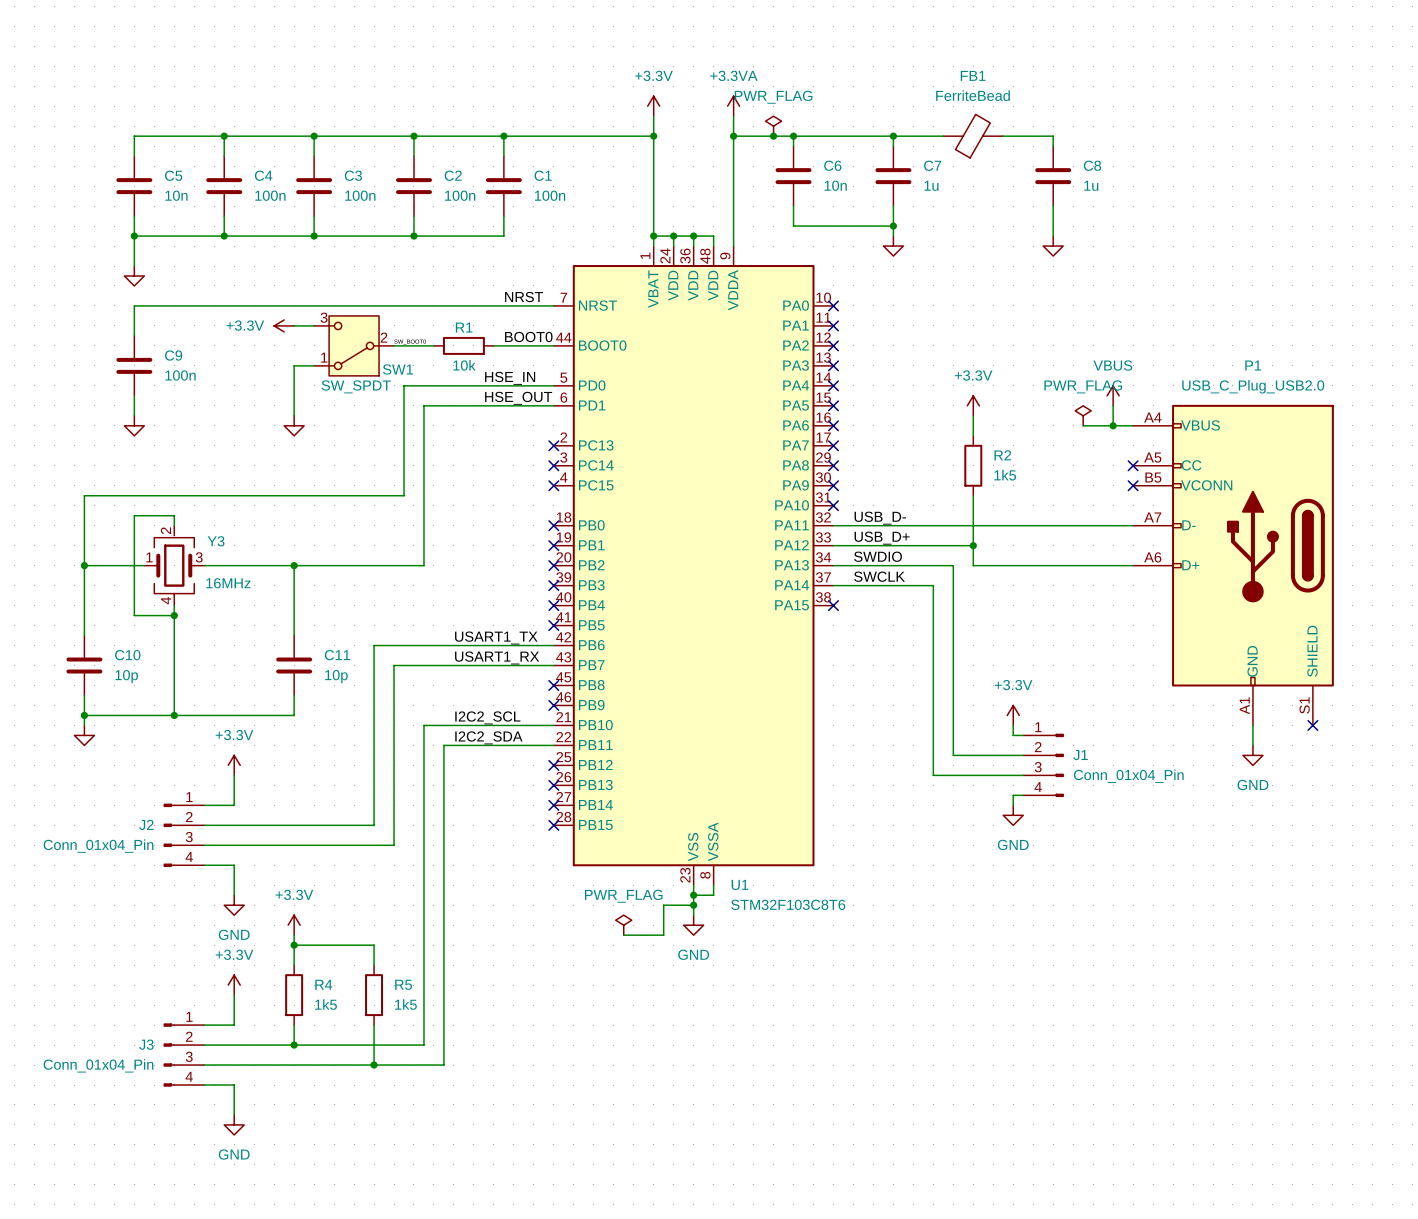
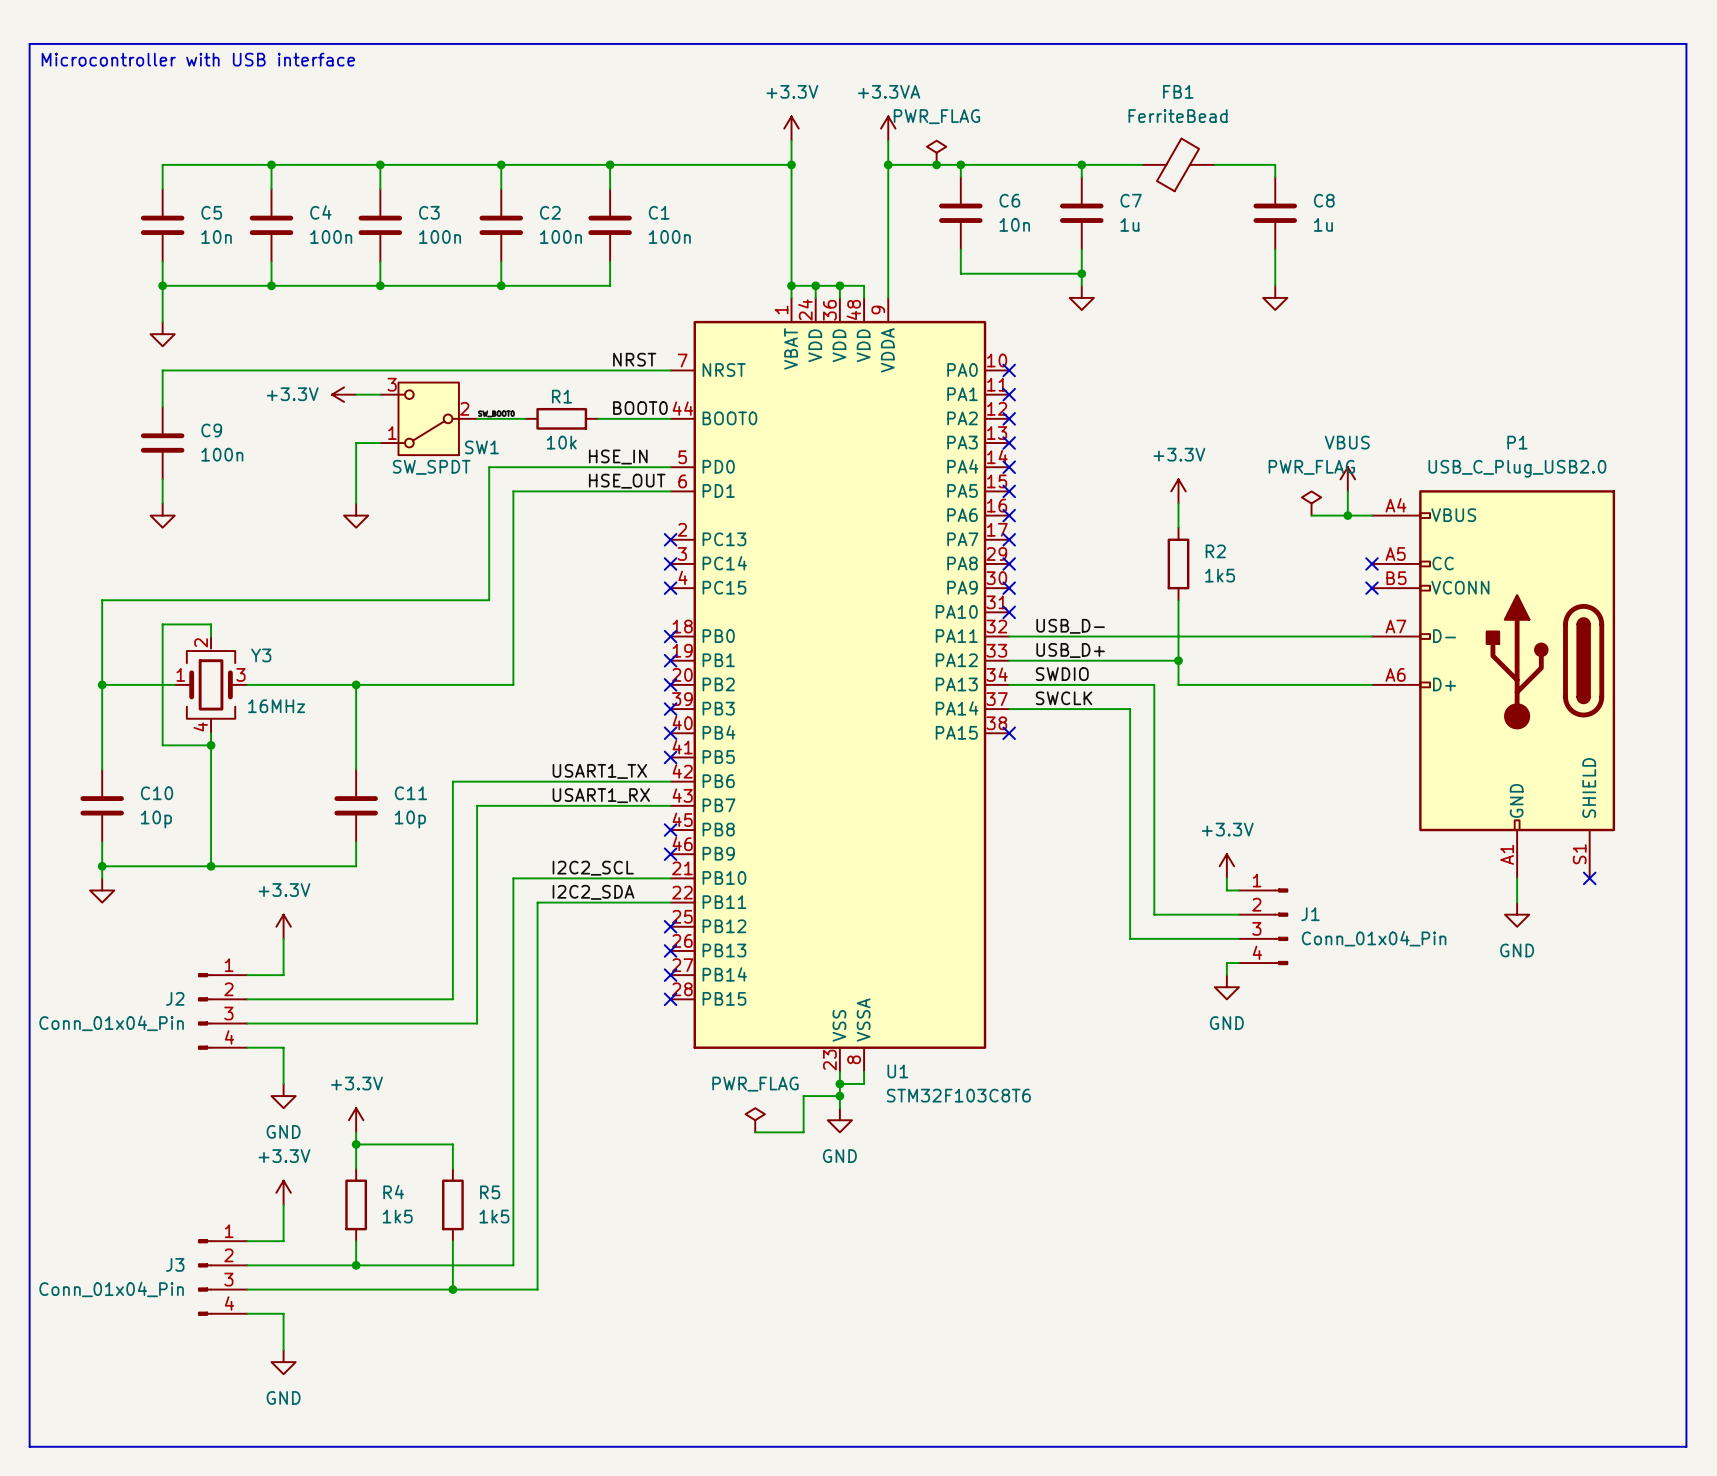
line: none -> (29, 43) (1686, 43) (1686, 1446) (29, 1446) (29, 43)
text: none -> Microcontroller with USB interface (198, 59)

